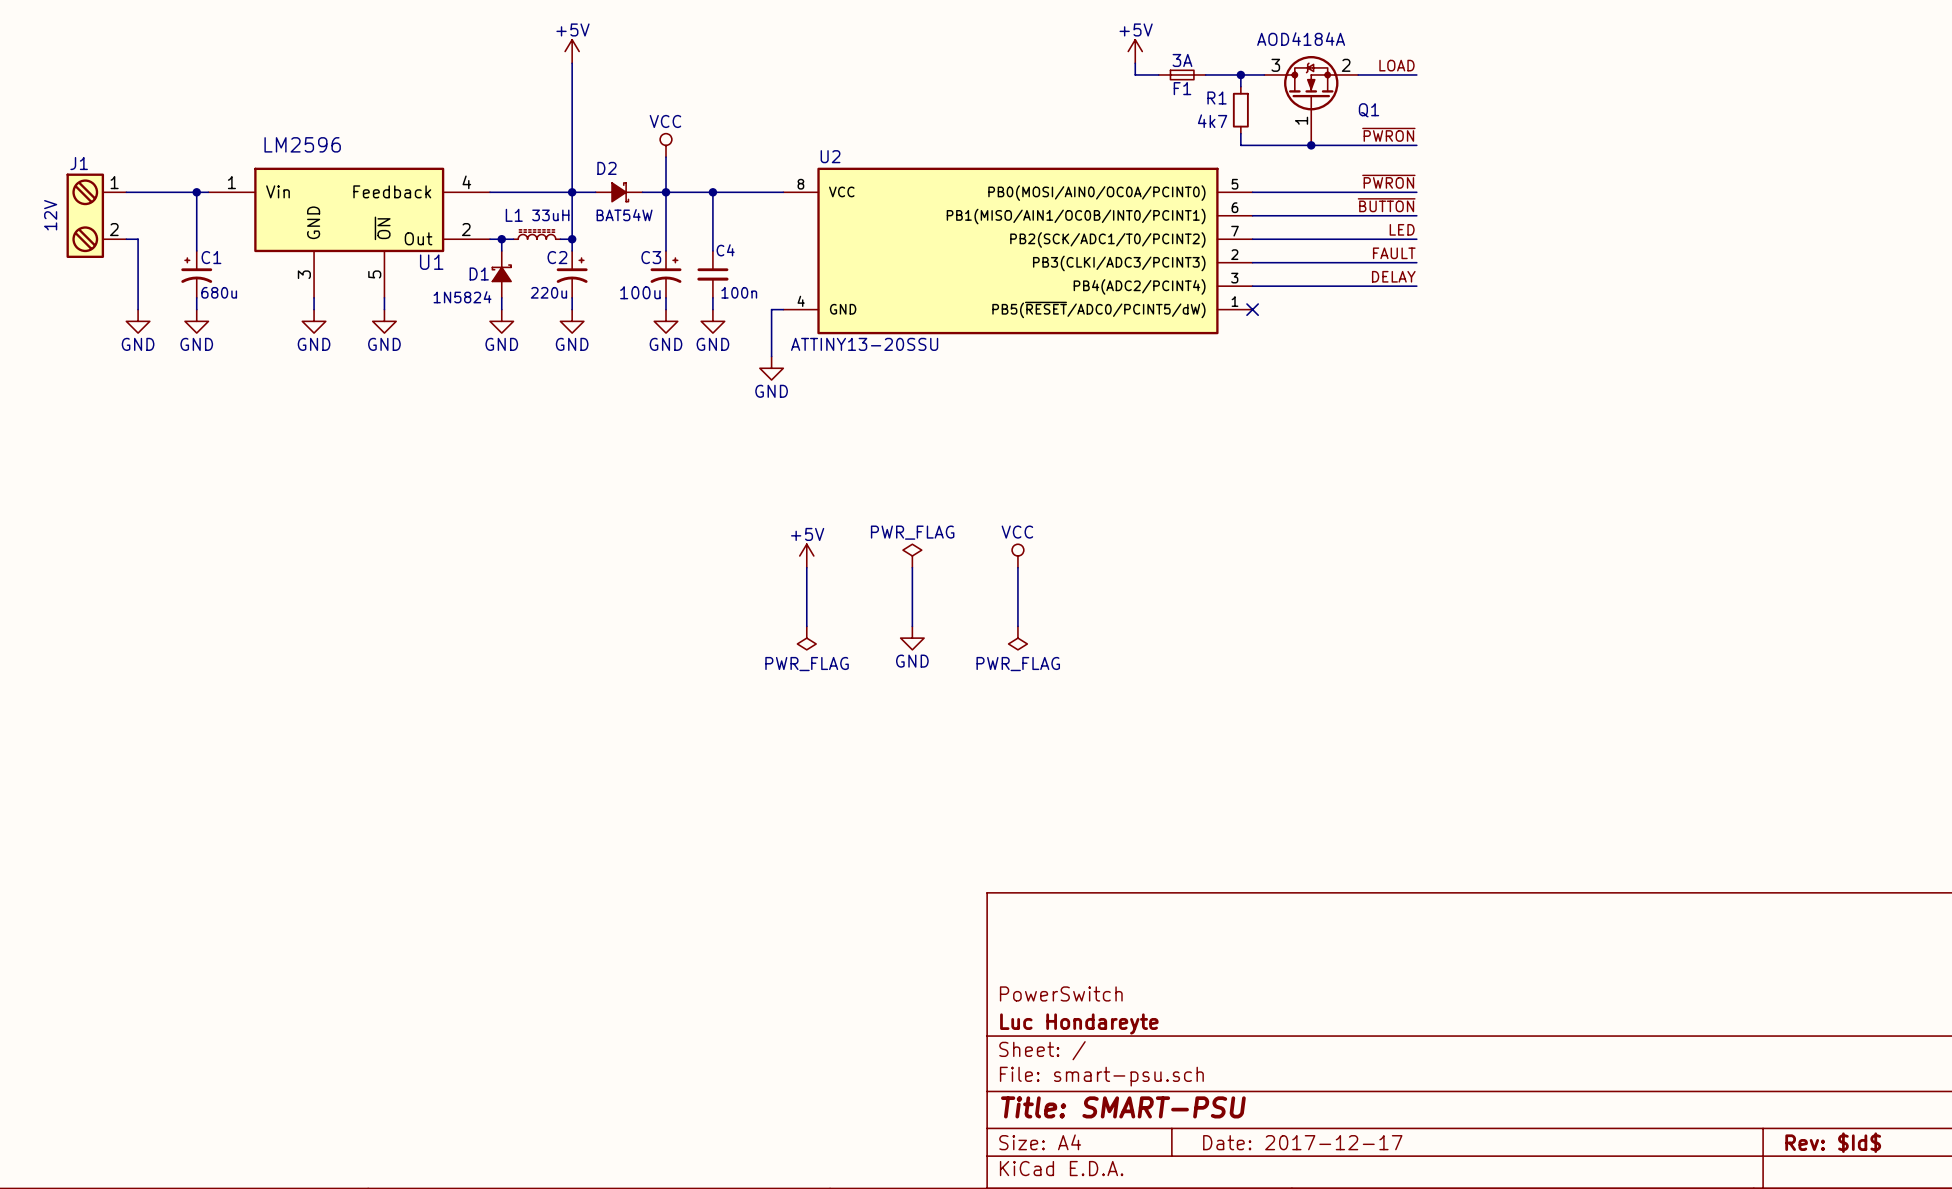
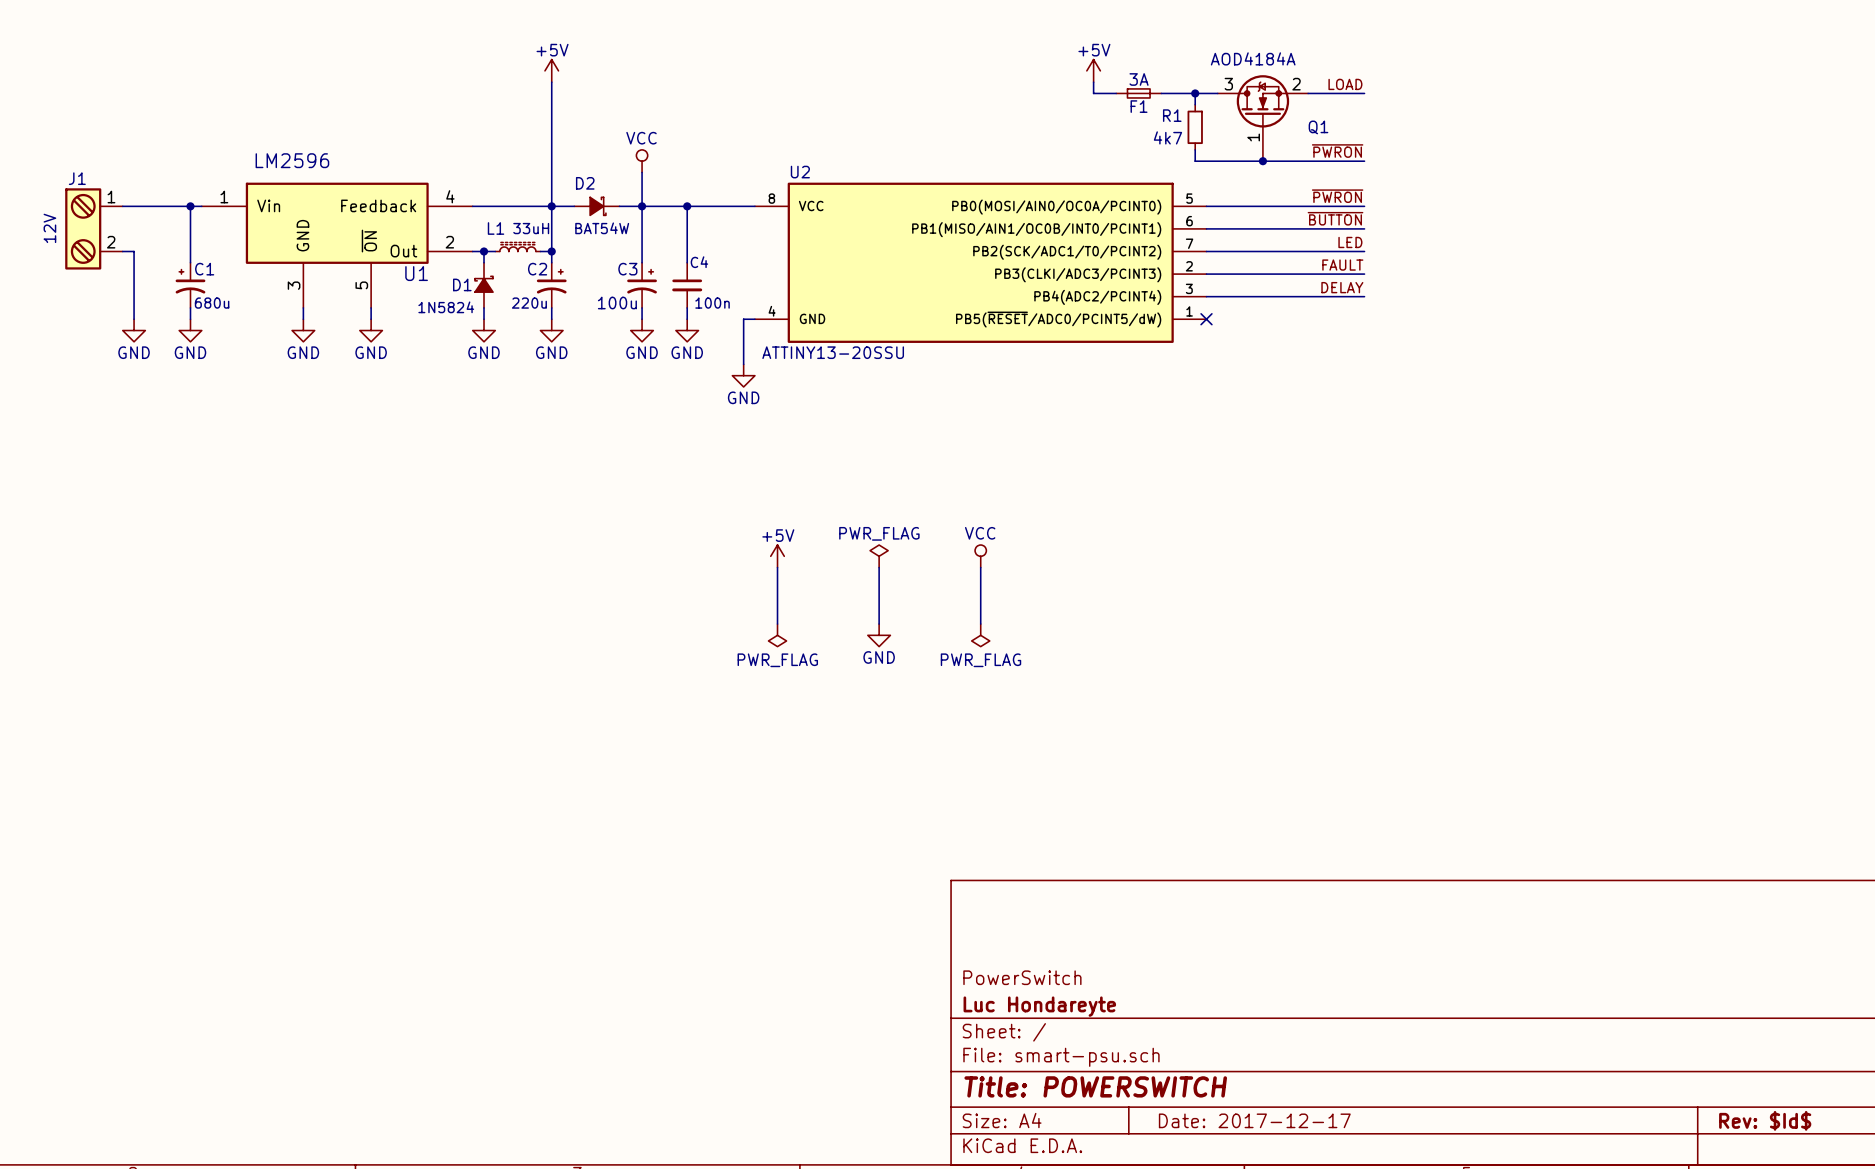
title block: Title: SMART-PSU (1123, 1107) -> Title: POWERSWITCH (1095, 1086)

